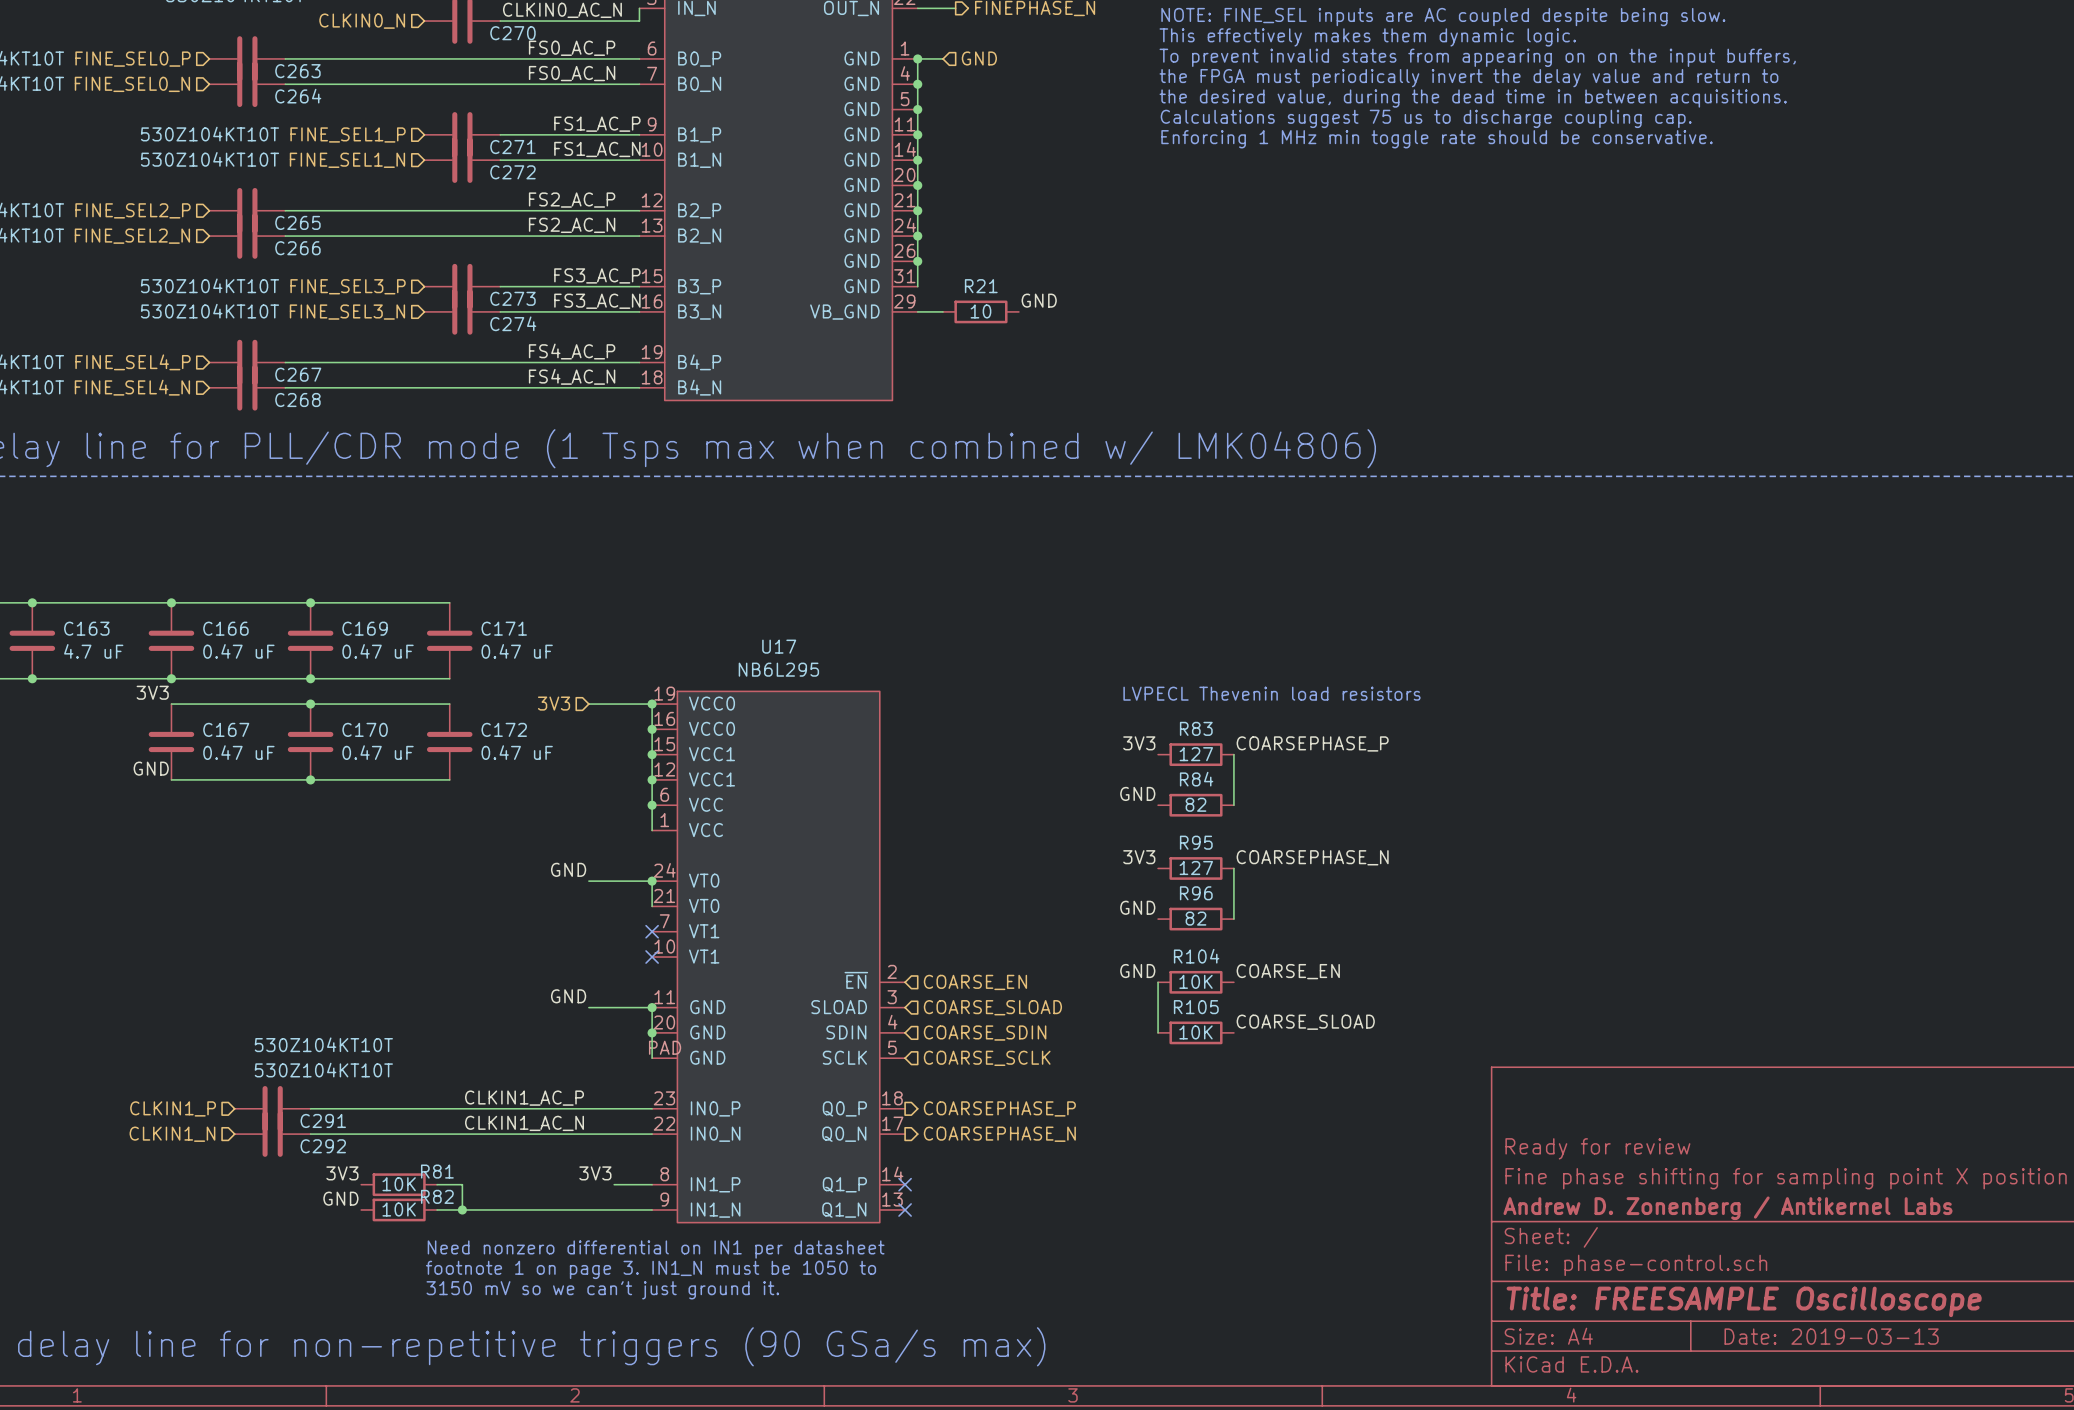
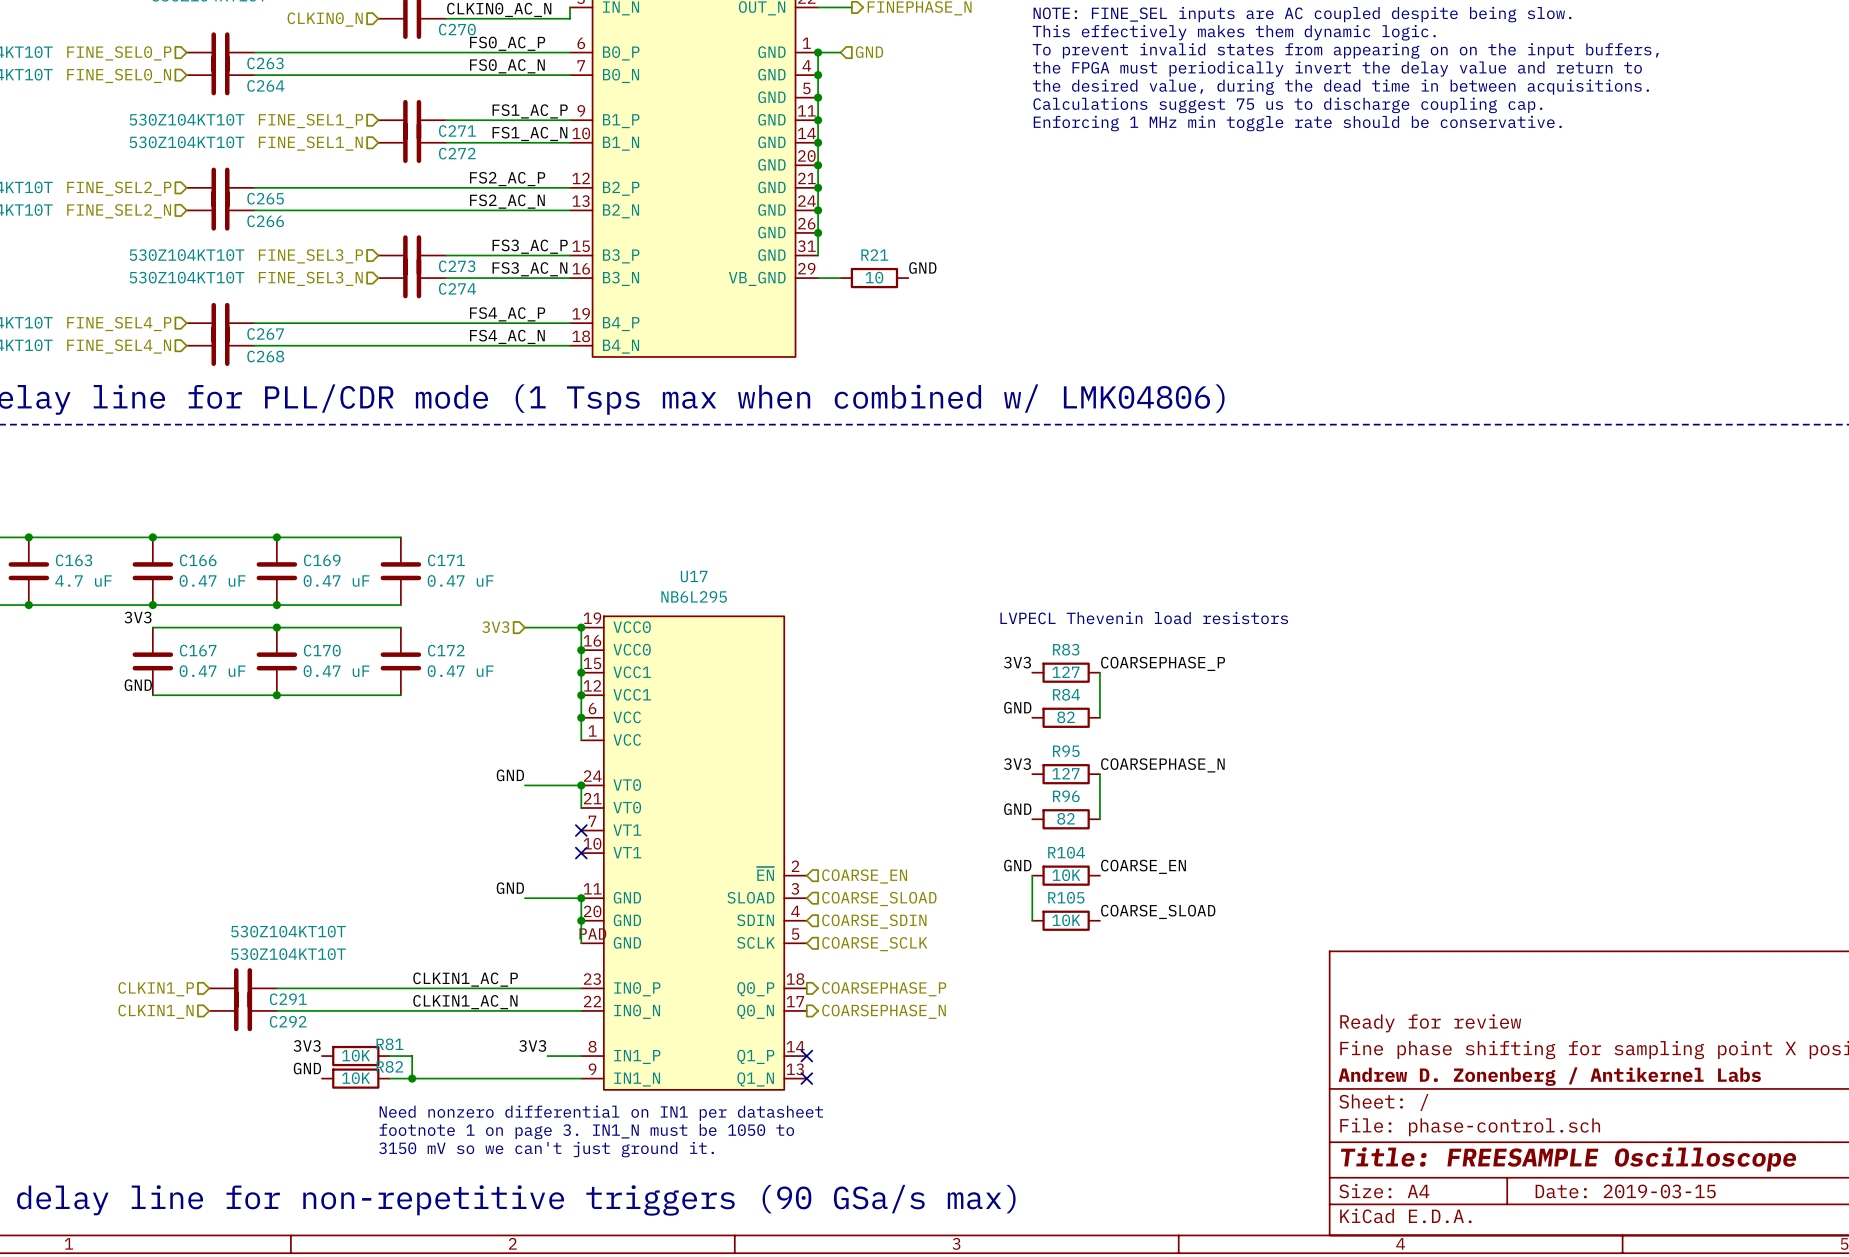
title block: Date: 2019-03-13 (1831, 1336) -> Date: 2019-03-15 (1625, 1191)

